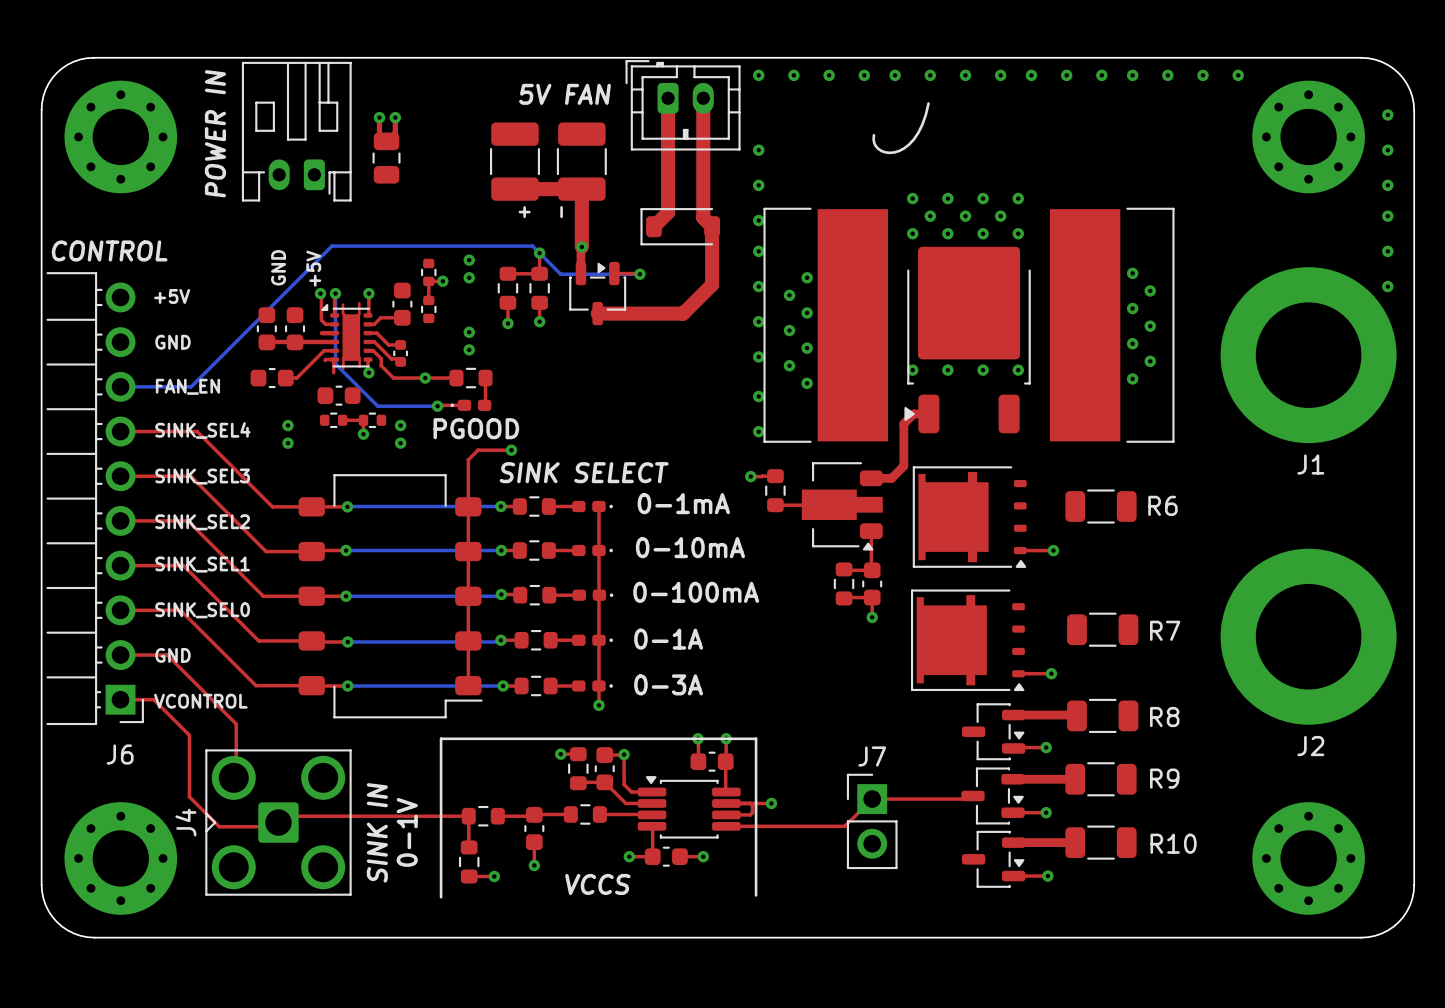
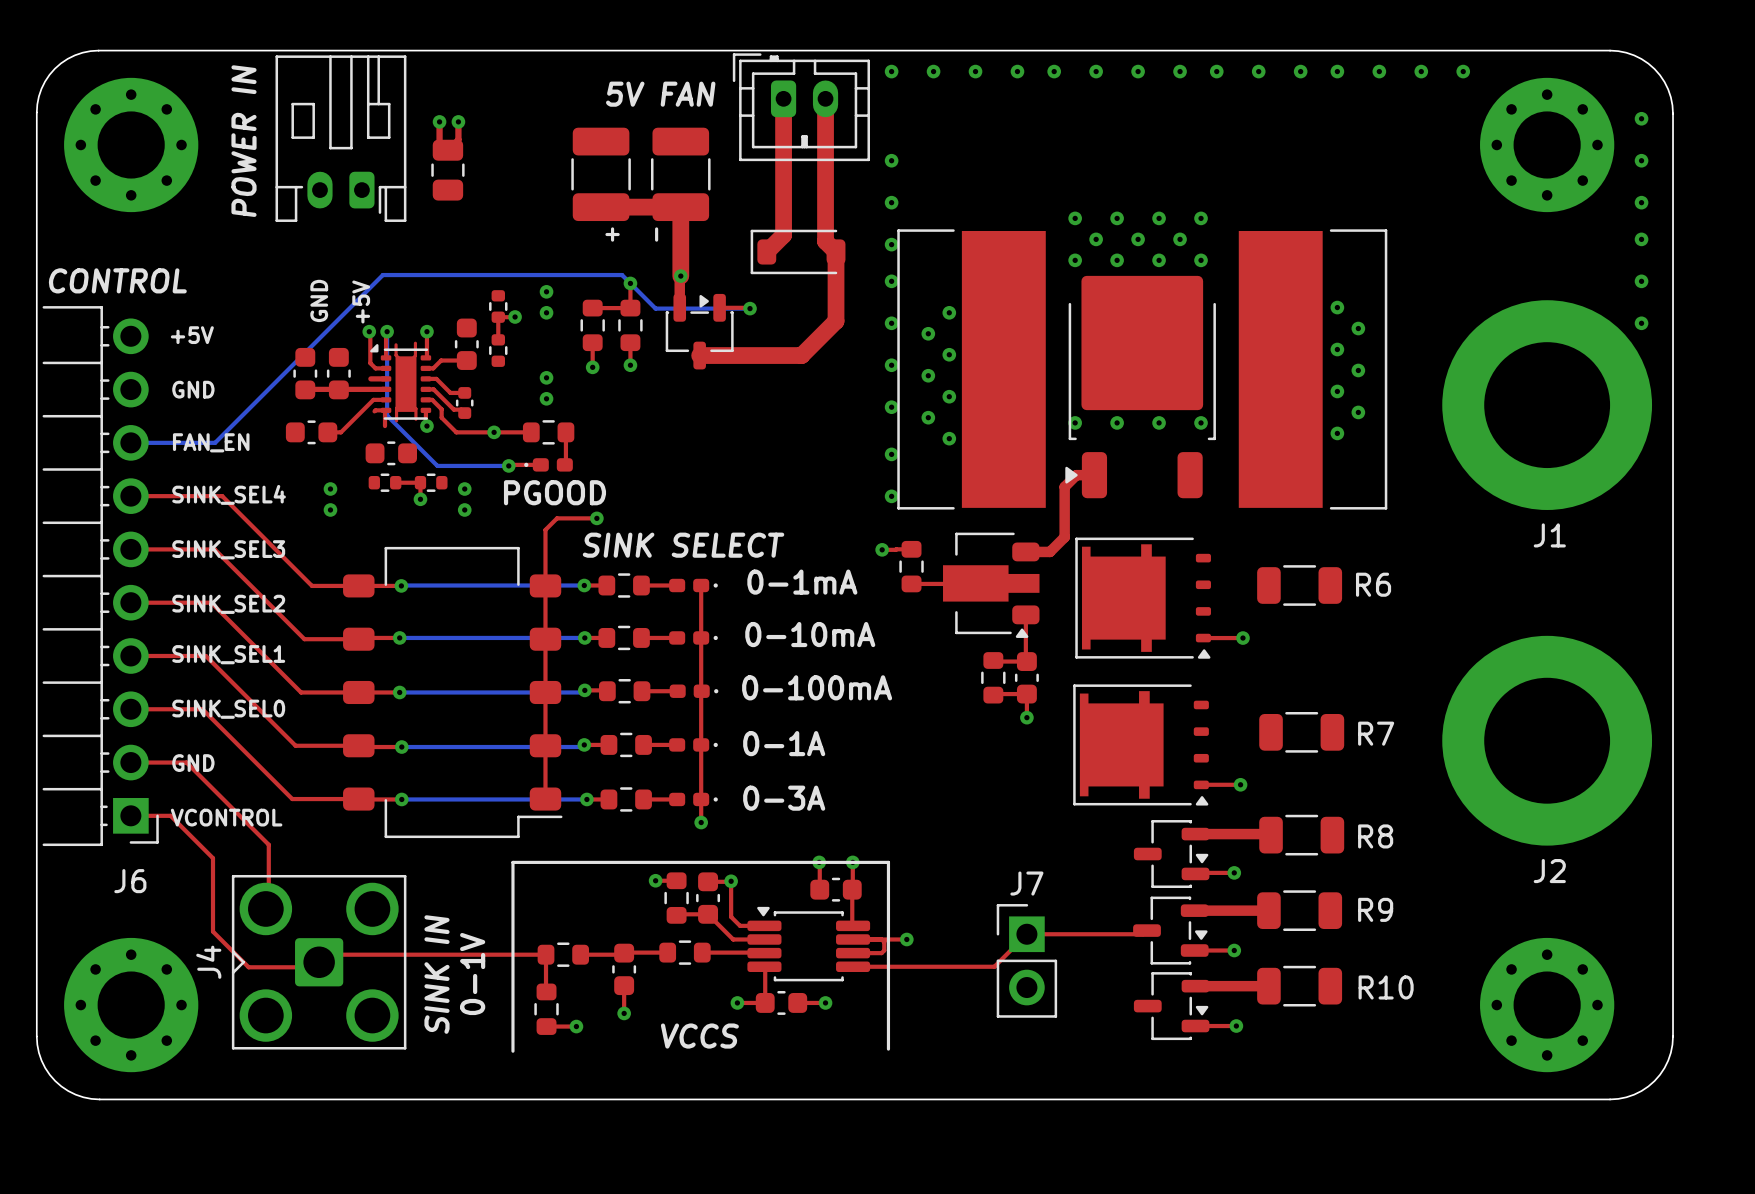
line: (928, 103) (918, 132) (904, 148) (894, 152) (881, 151) (874, 143) (873, 135) -> none

